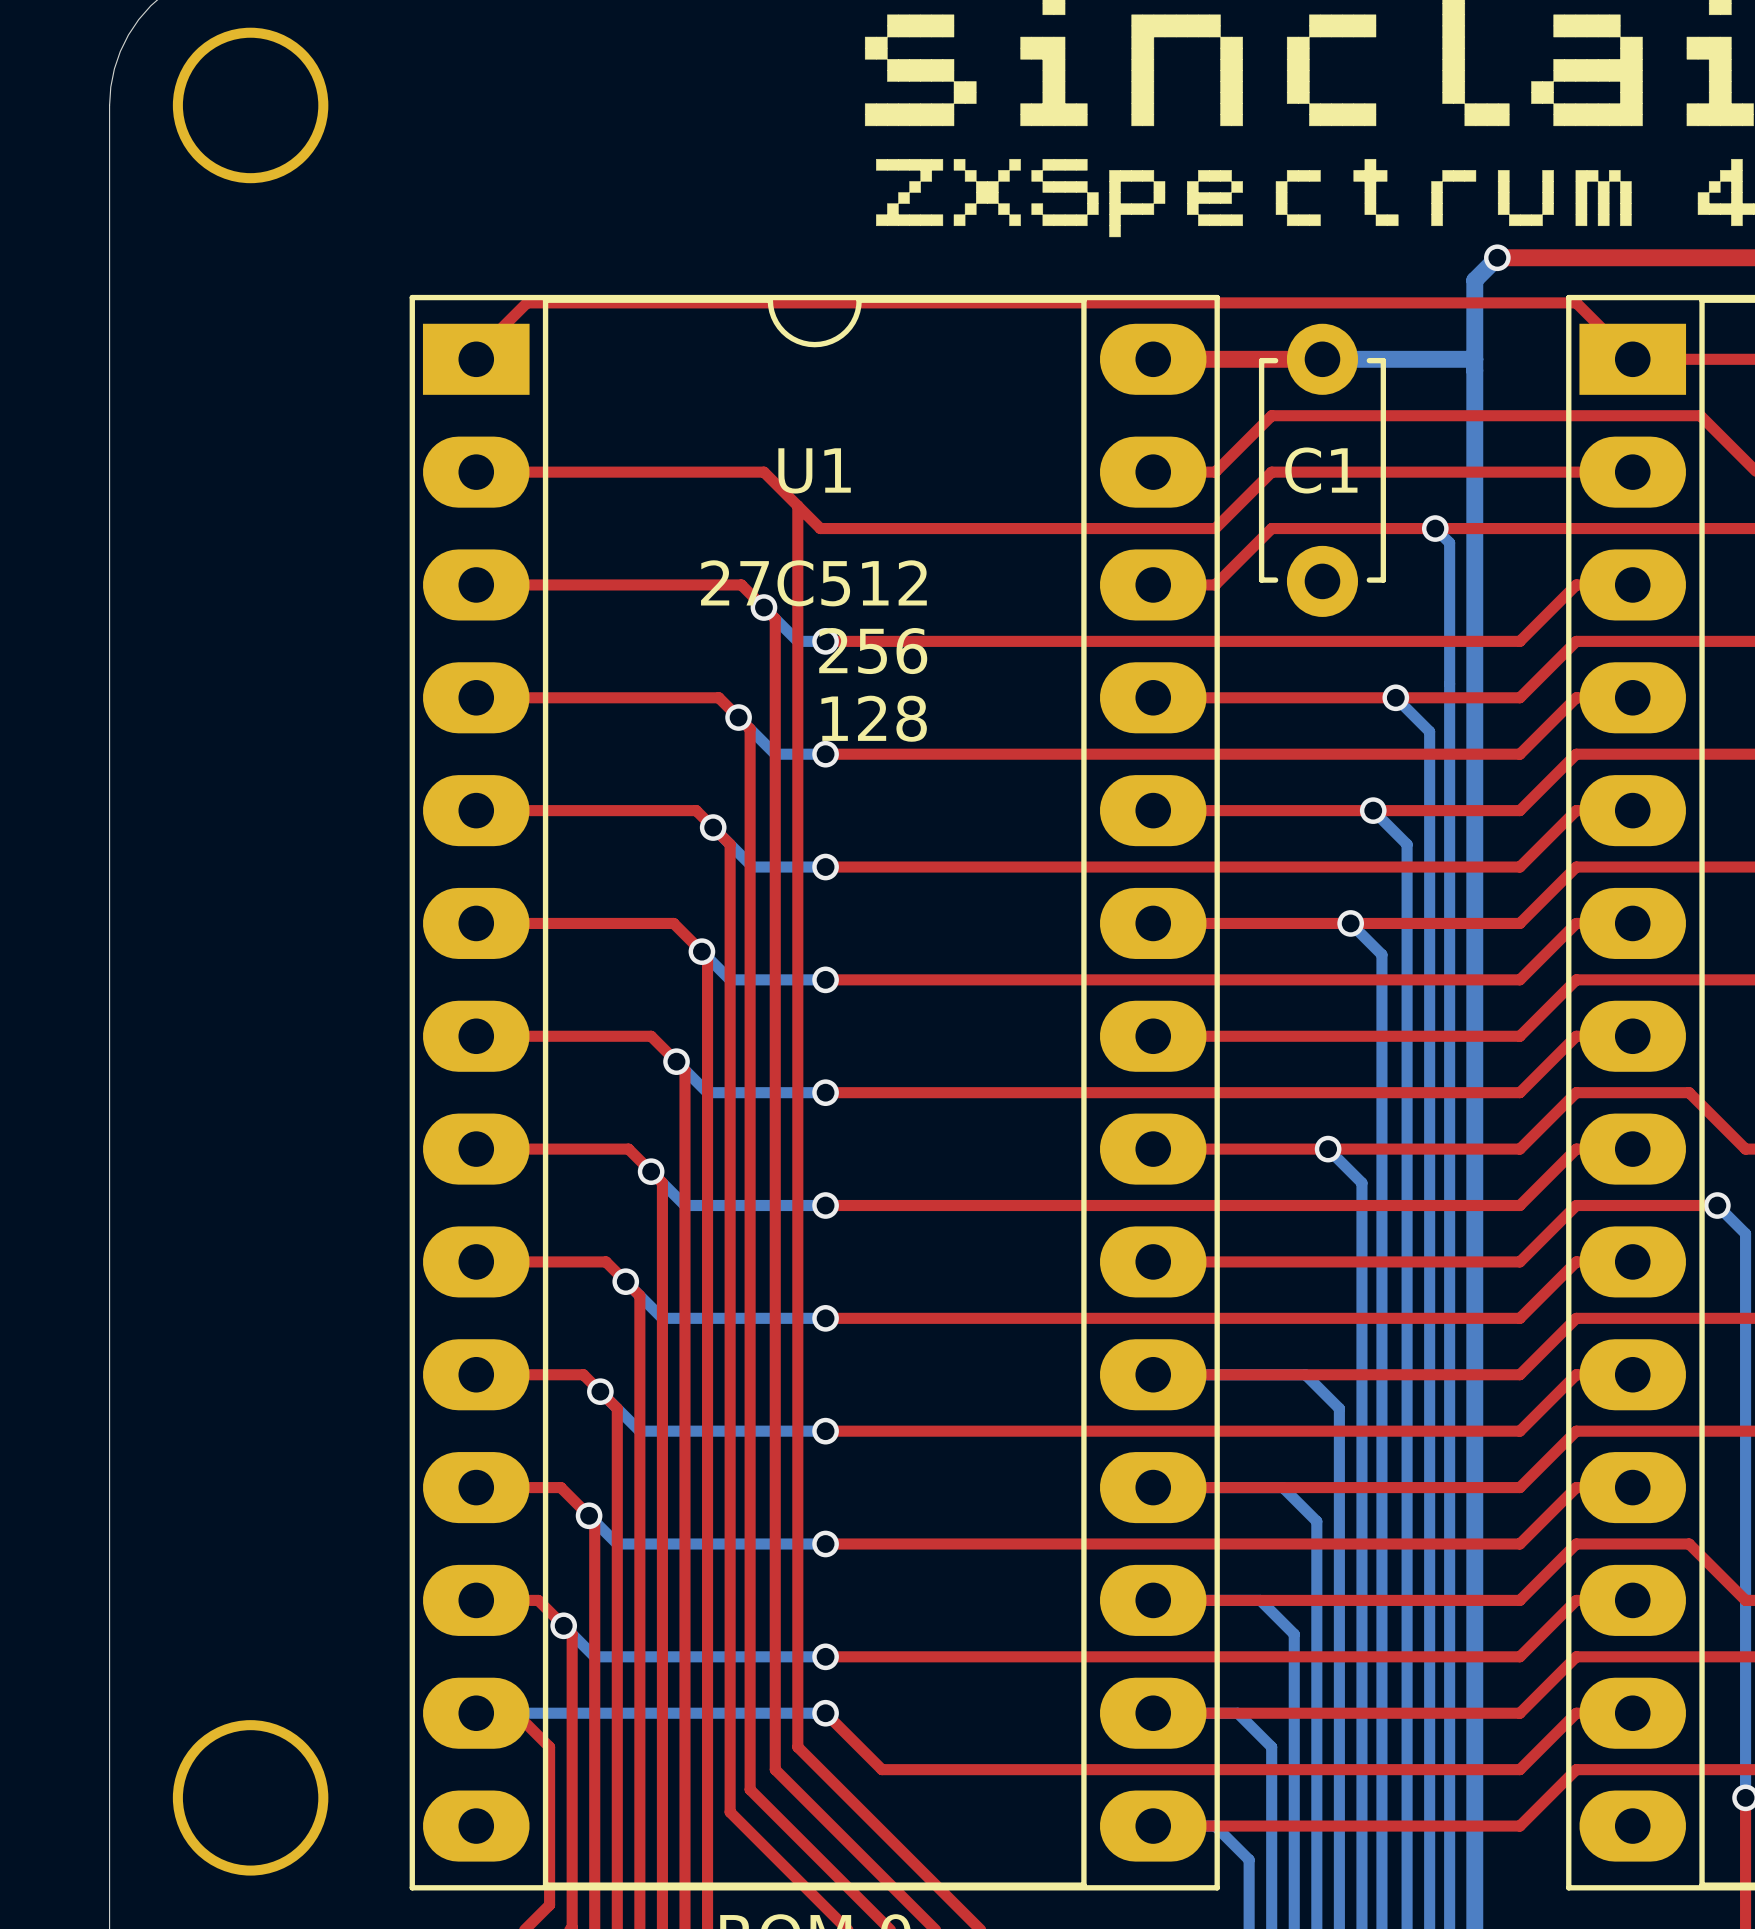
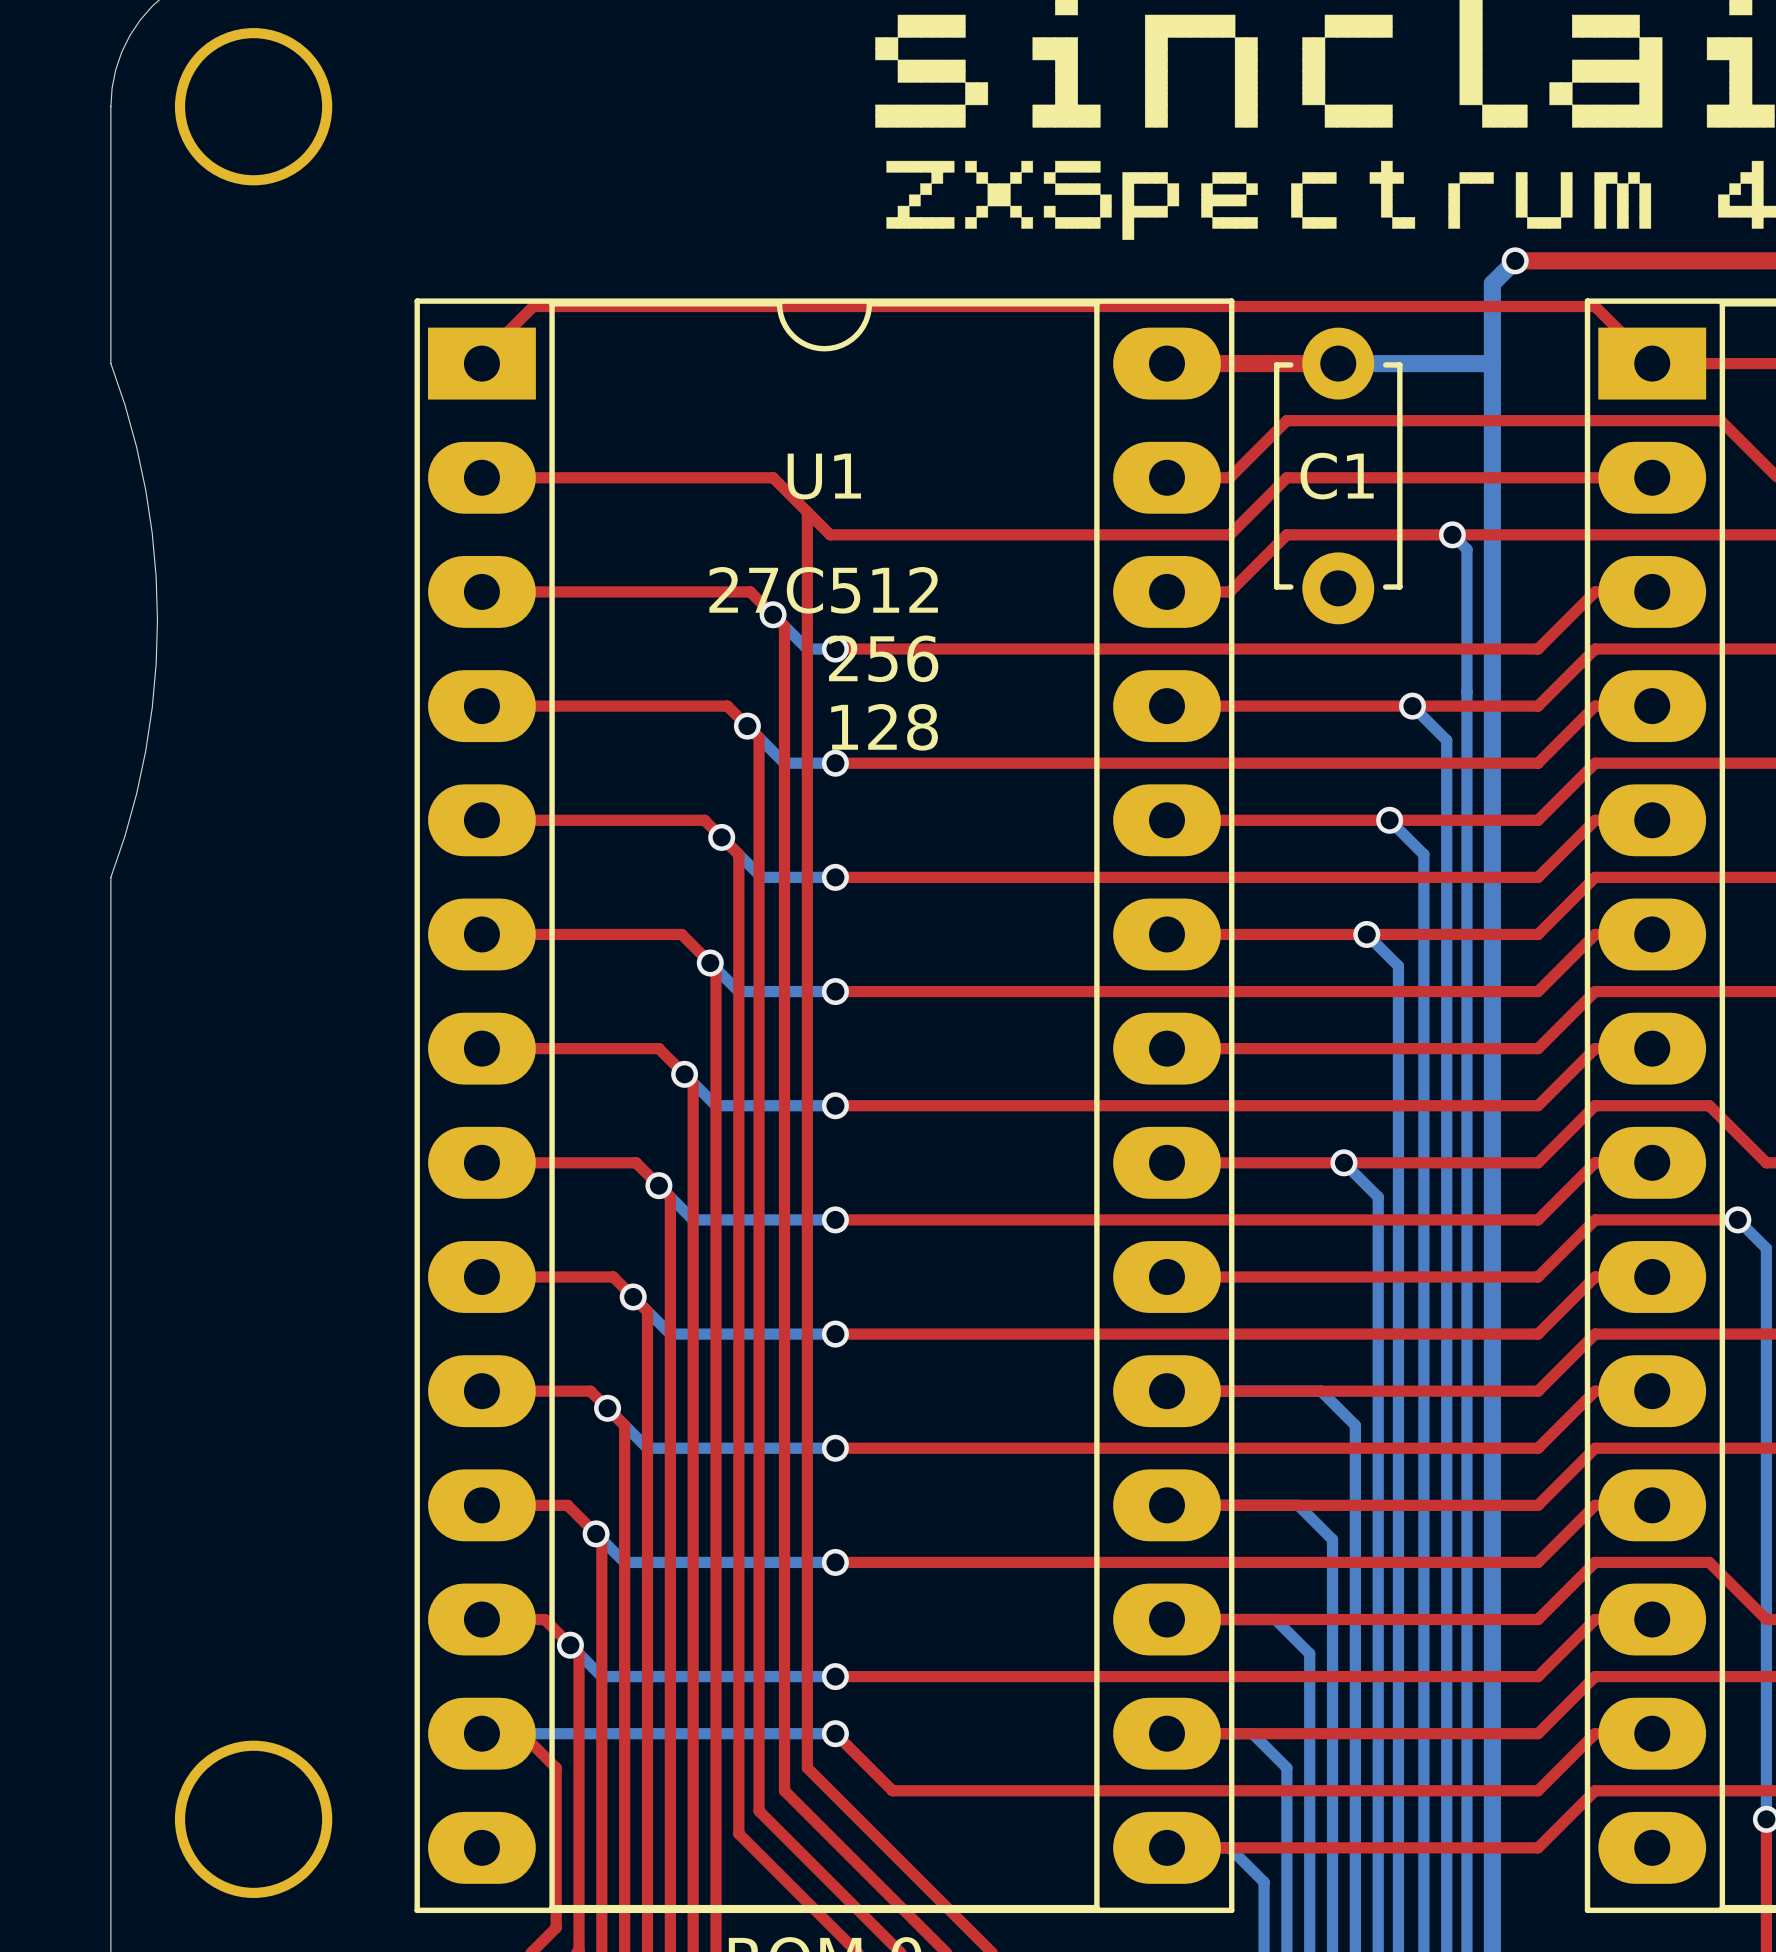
board edge: (109, 359) (109, 867) -> (110, 363) (136, 447) (145, 489) (152, 533) (157, 620) (152, 707) (145, 751) (125, 835) (110, 877)

